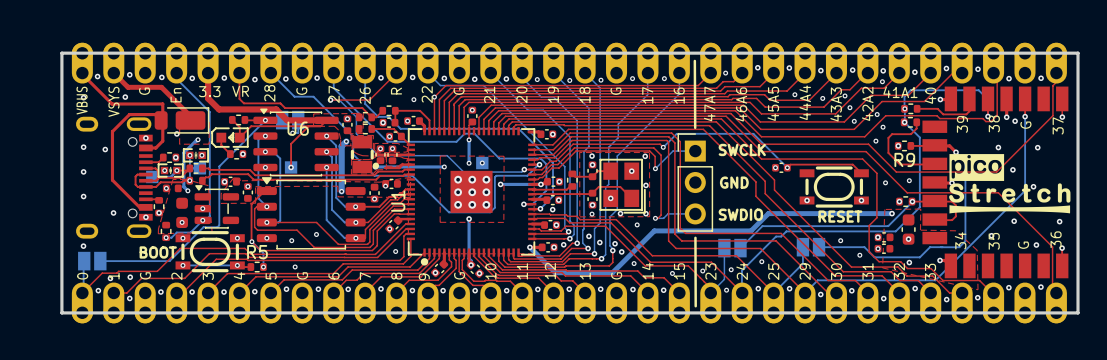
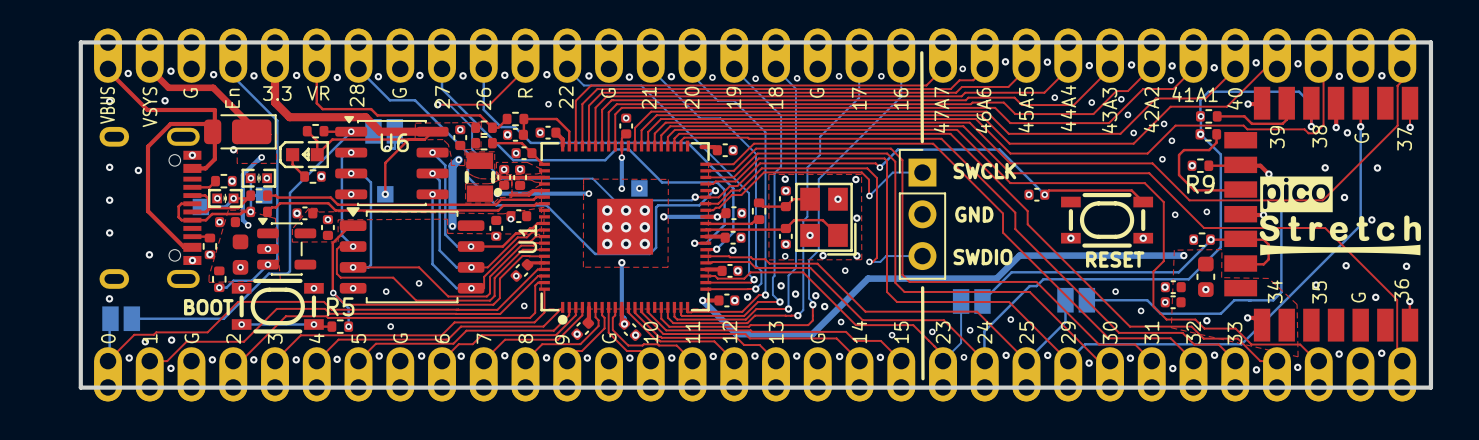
via: (434, 97) -> none

